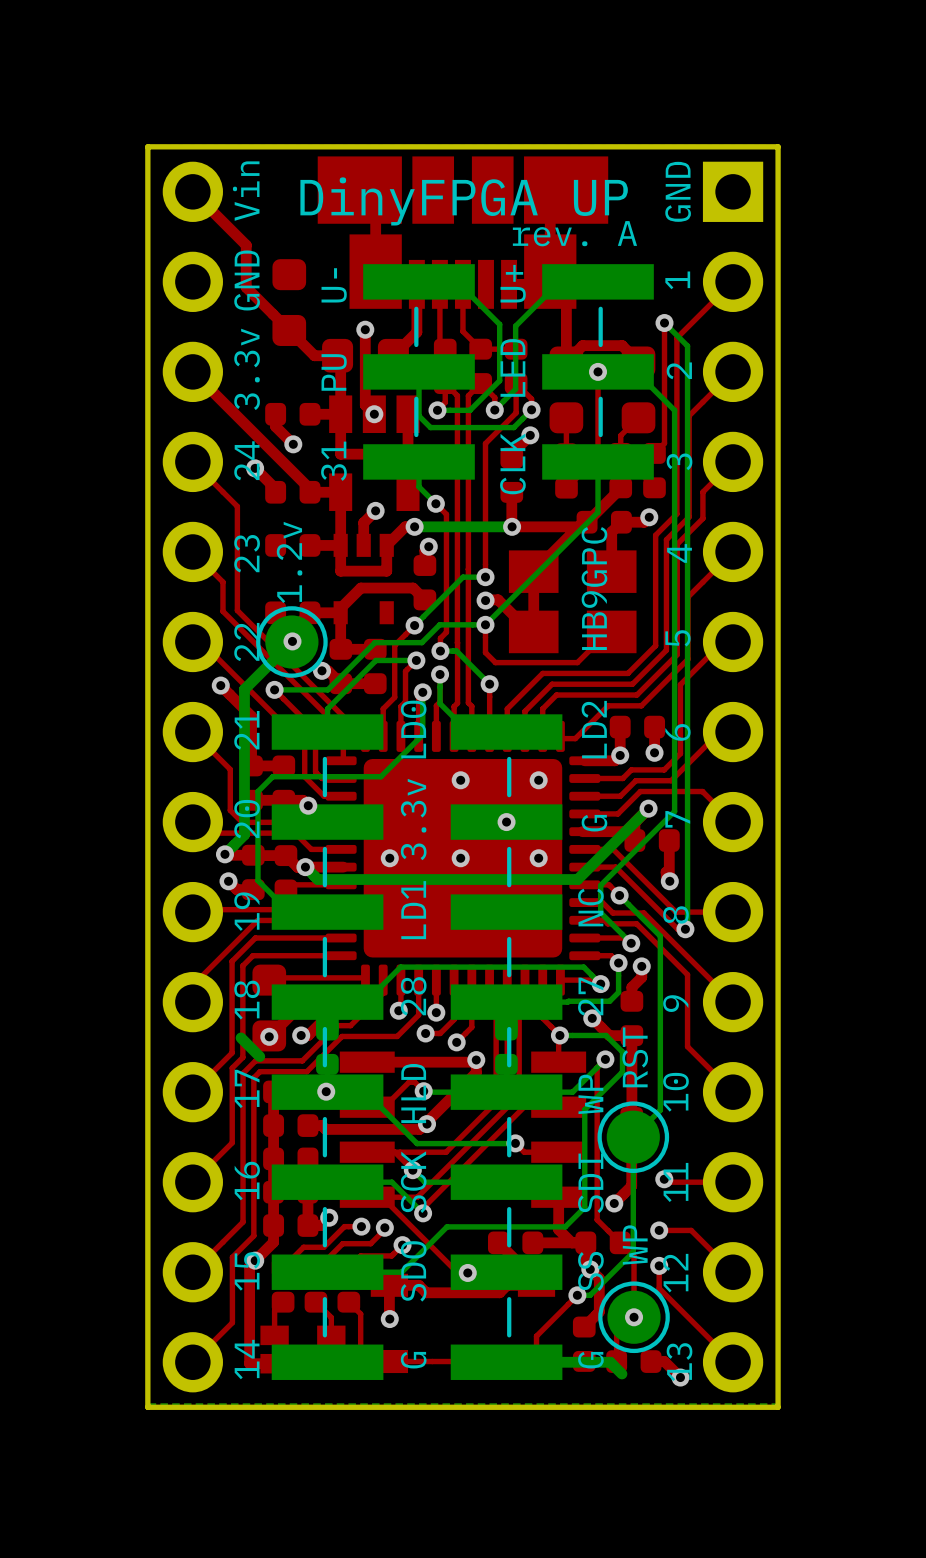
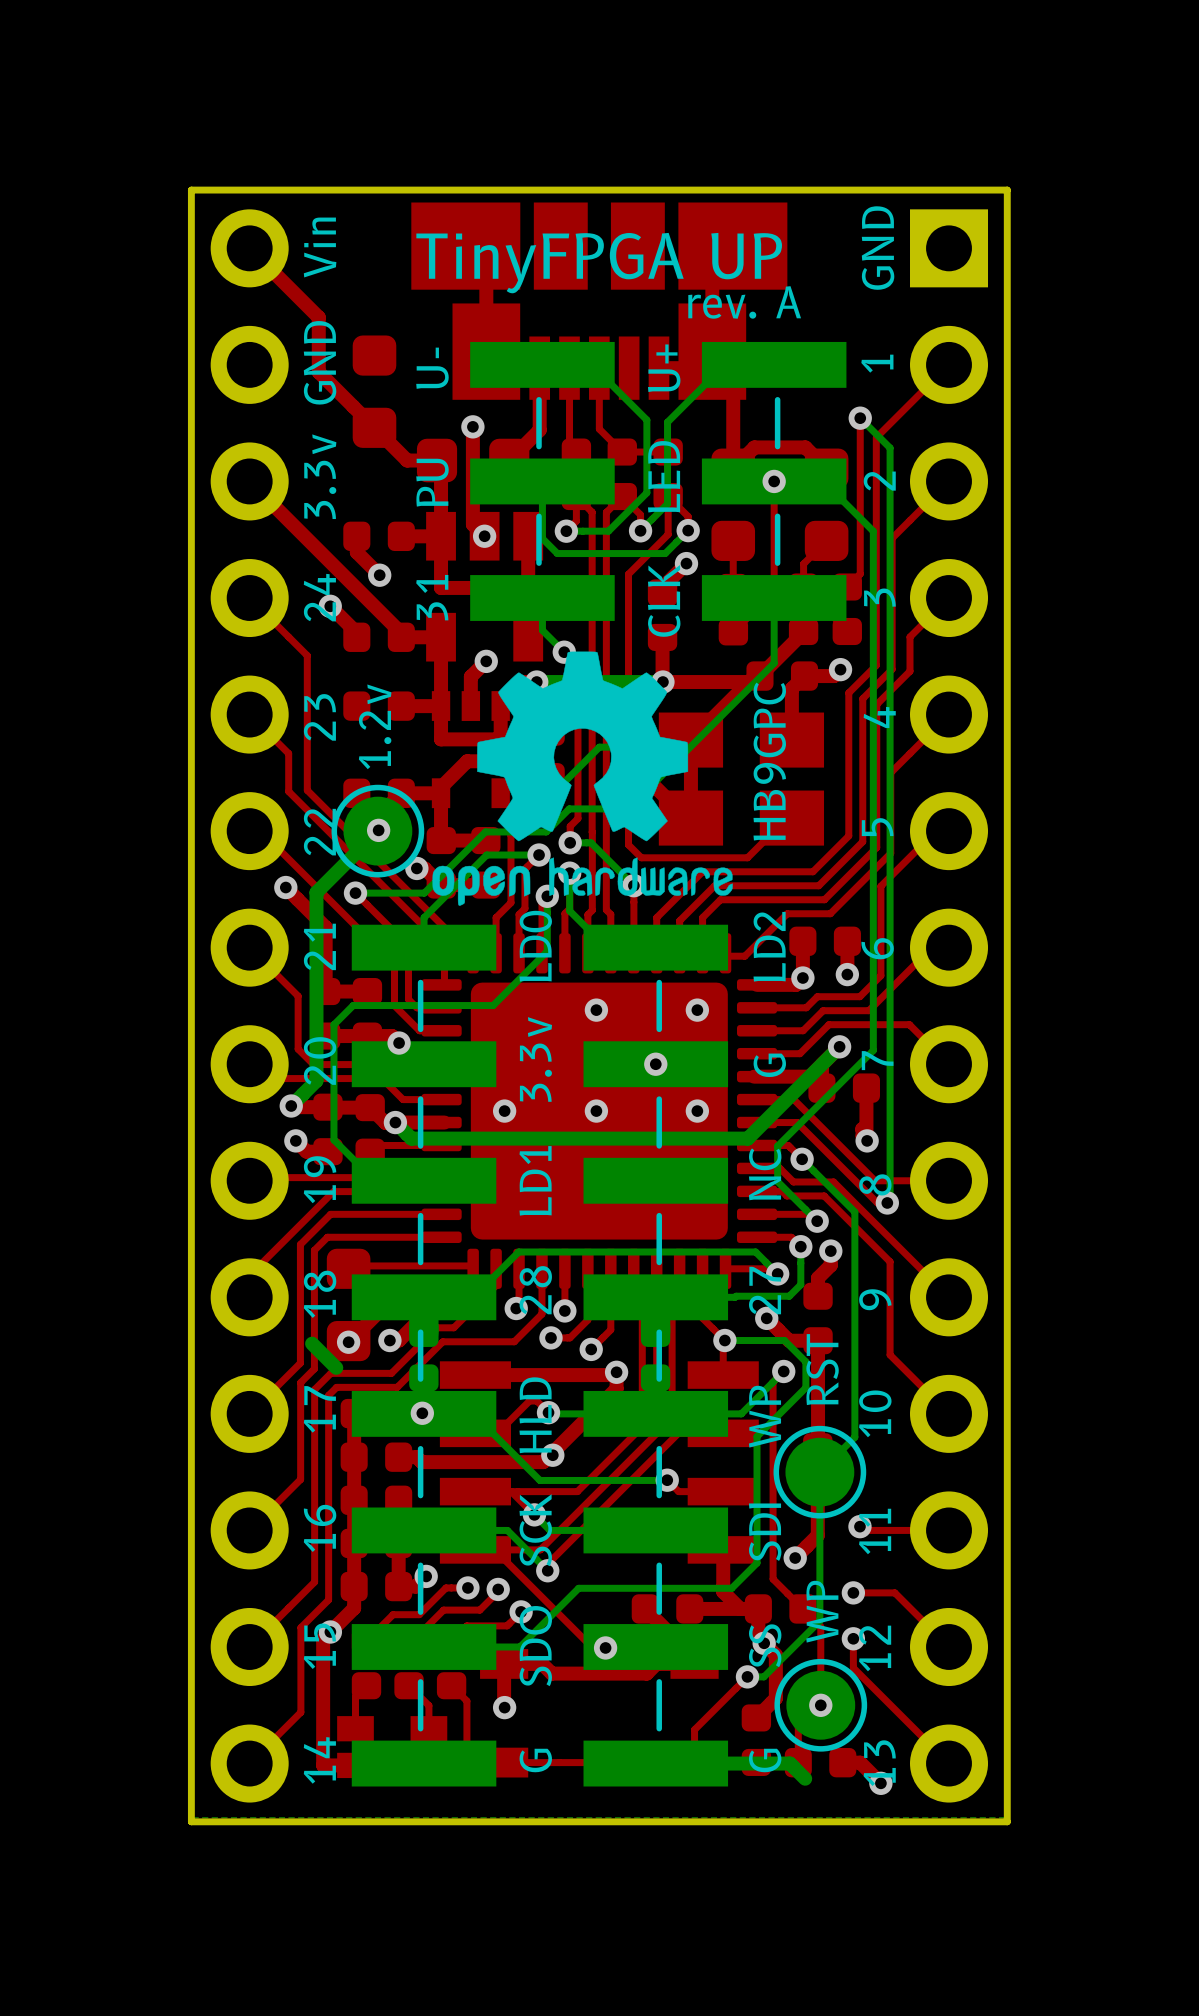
text: DinyFPGA UP (464, 201) -> TinyFPGA UP (599, 263)
drawing: none -> [432, 651, 733, 906]

